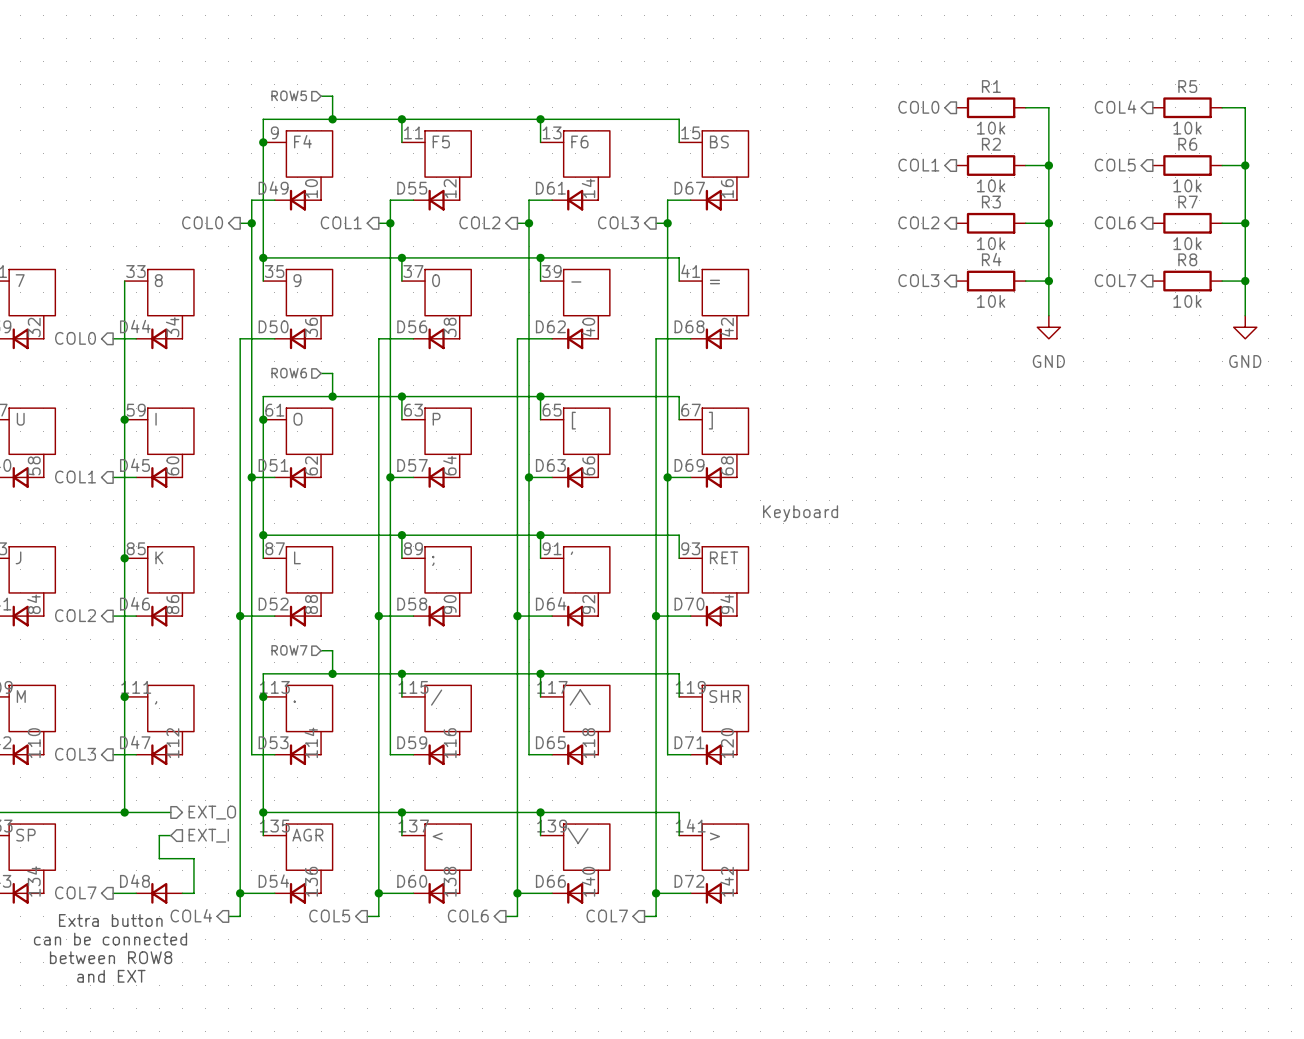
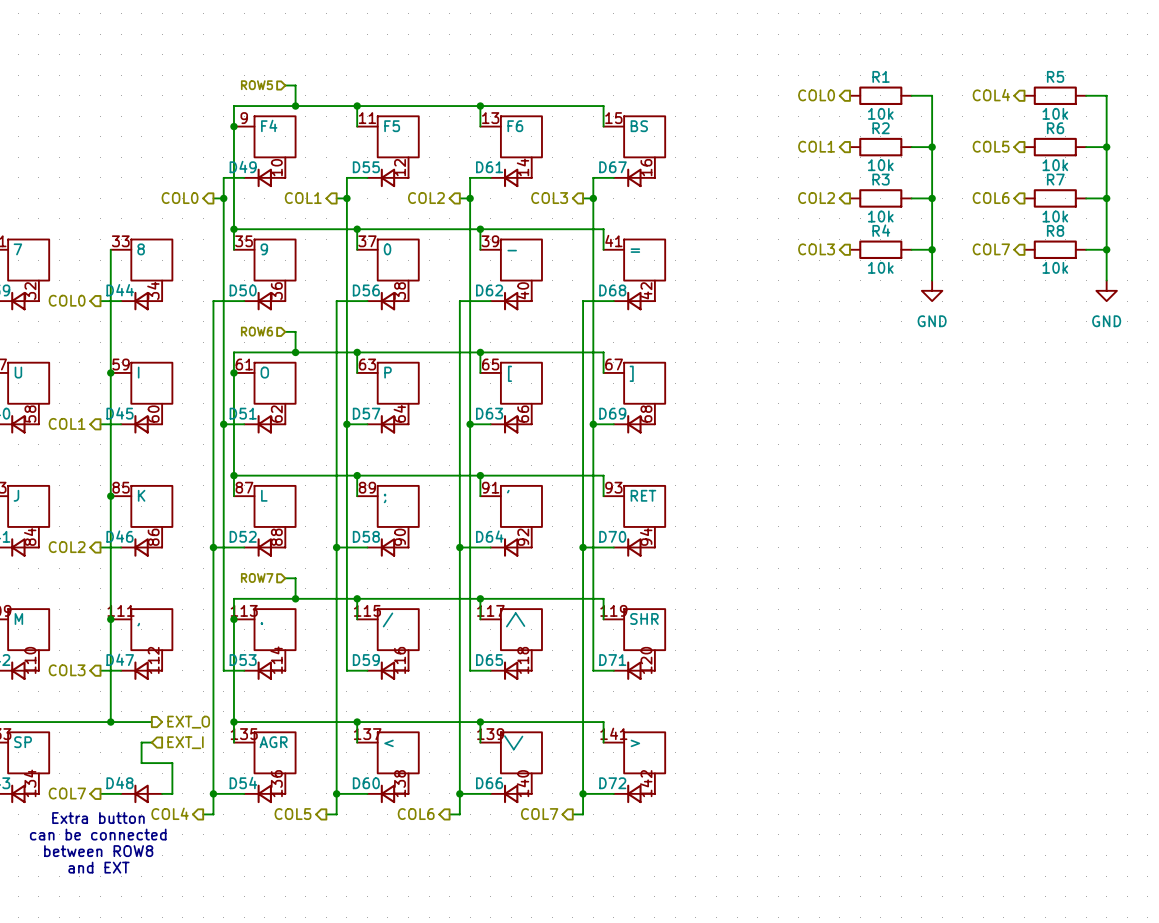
part value: Keyboard (800, 513) -> none

